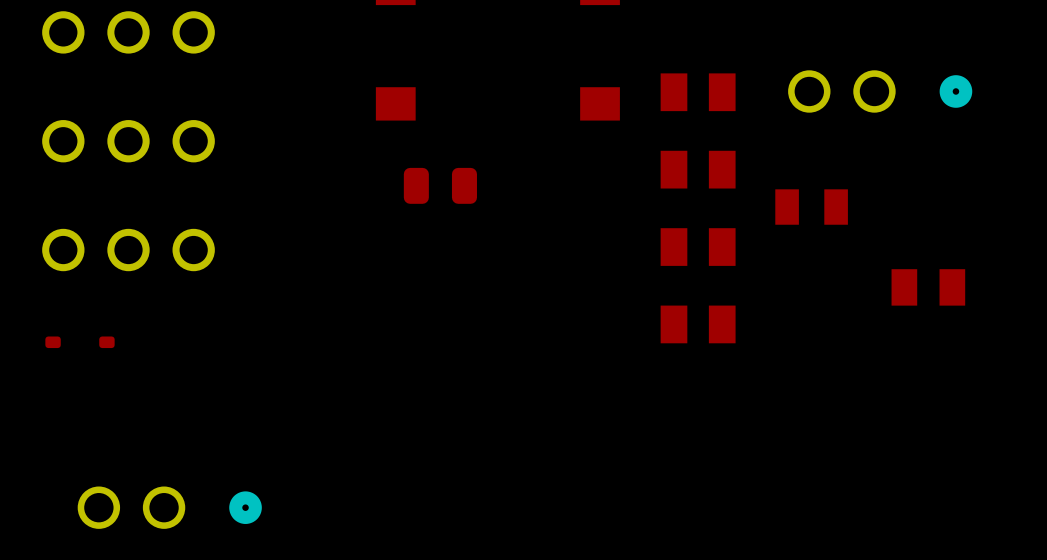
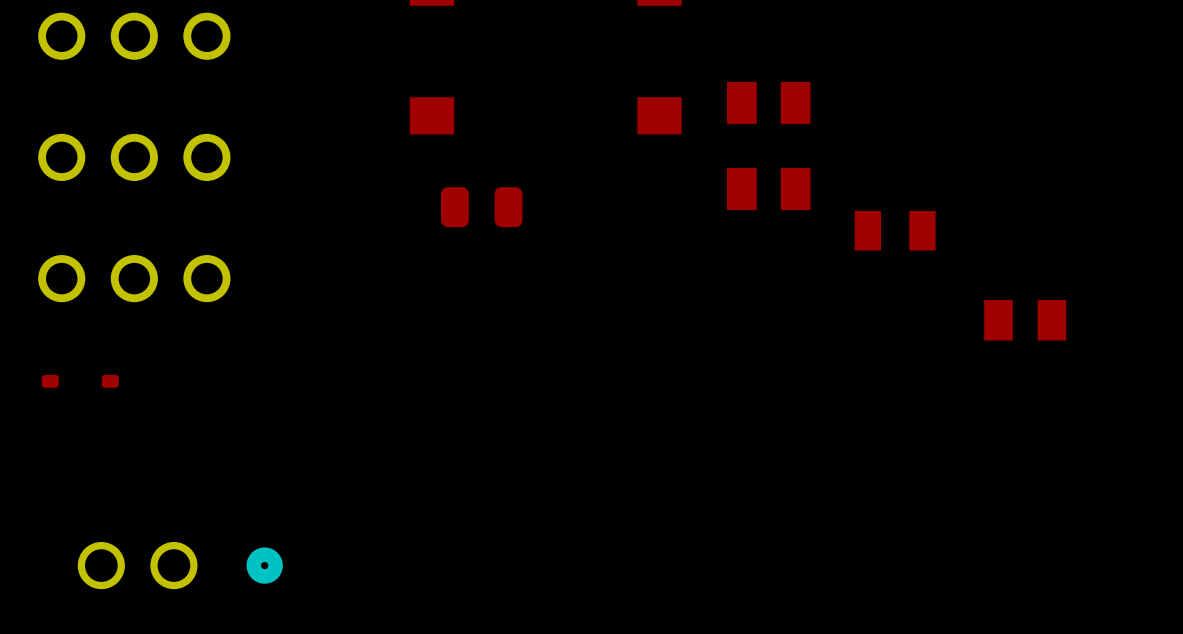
part: (880, 91) -> none
part: (698, 247) -> none
part: (698, 324) -> none

